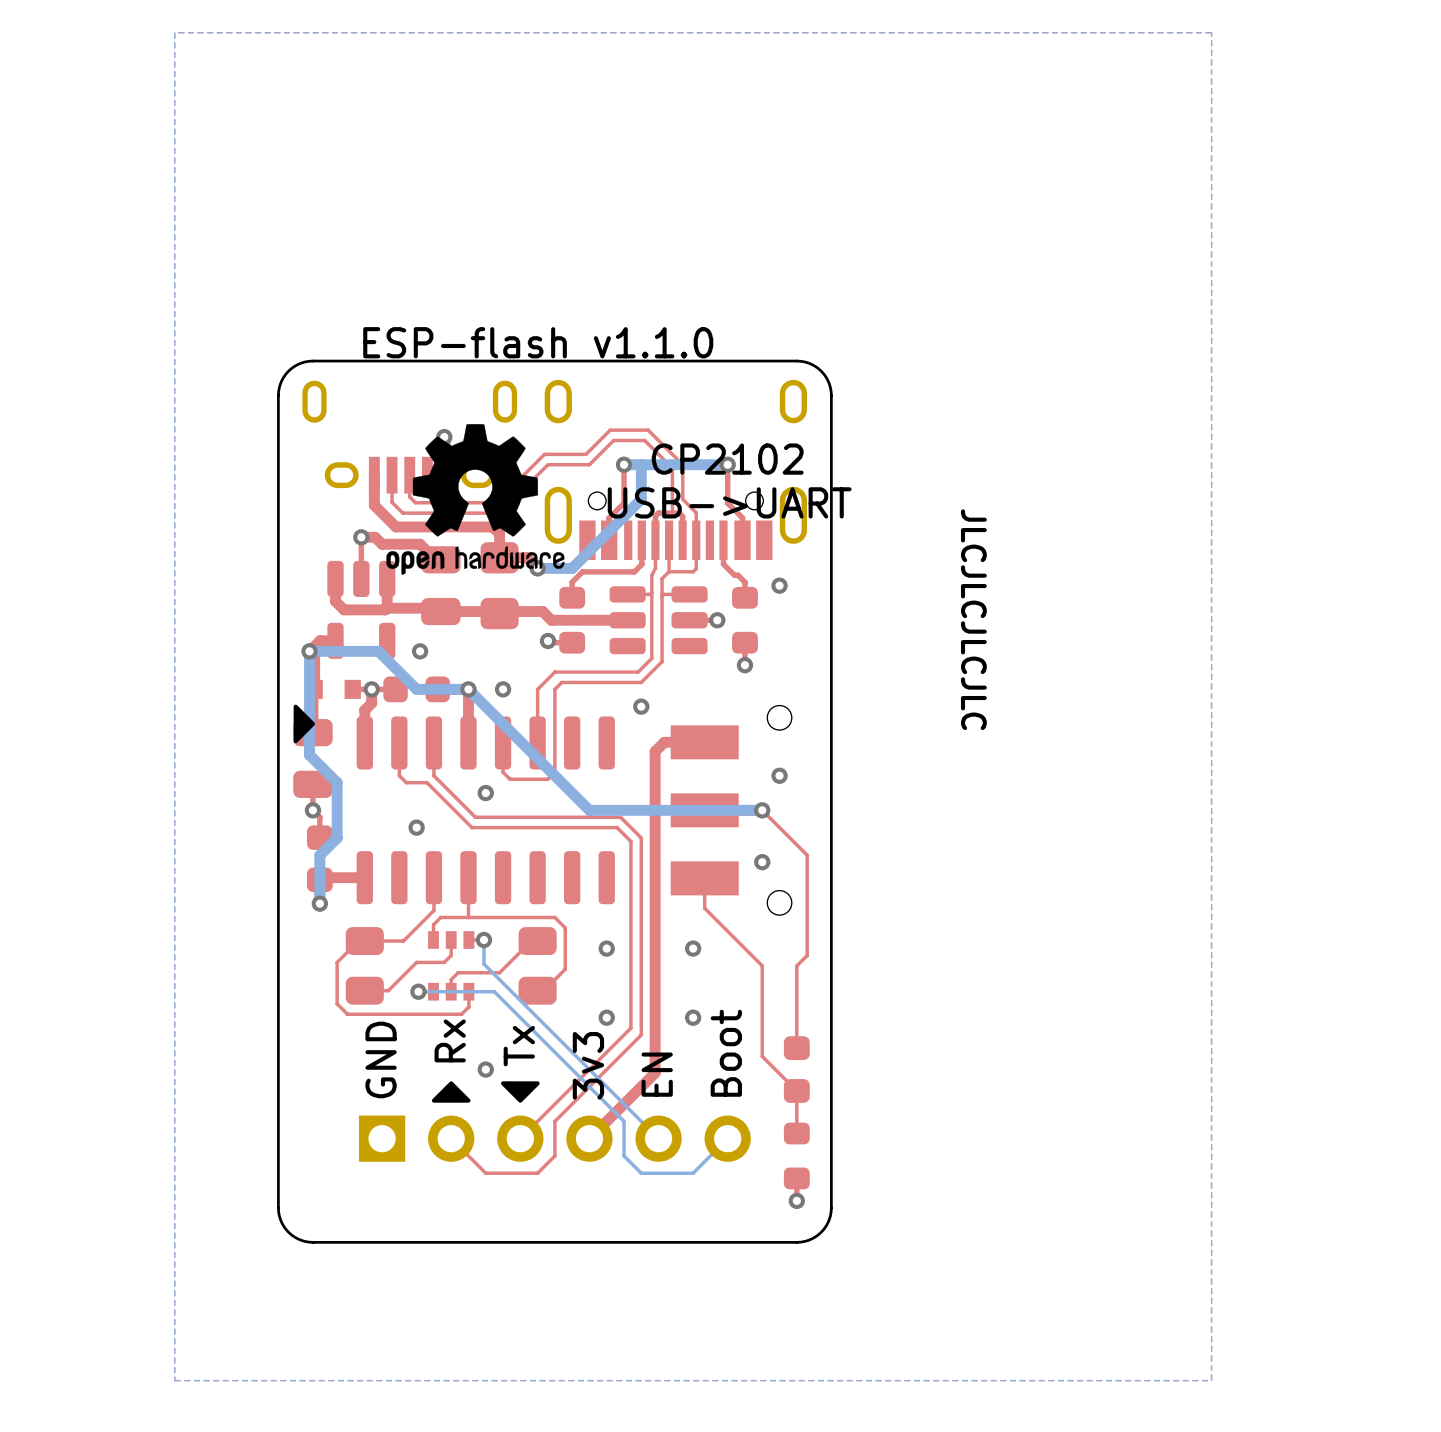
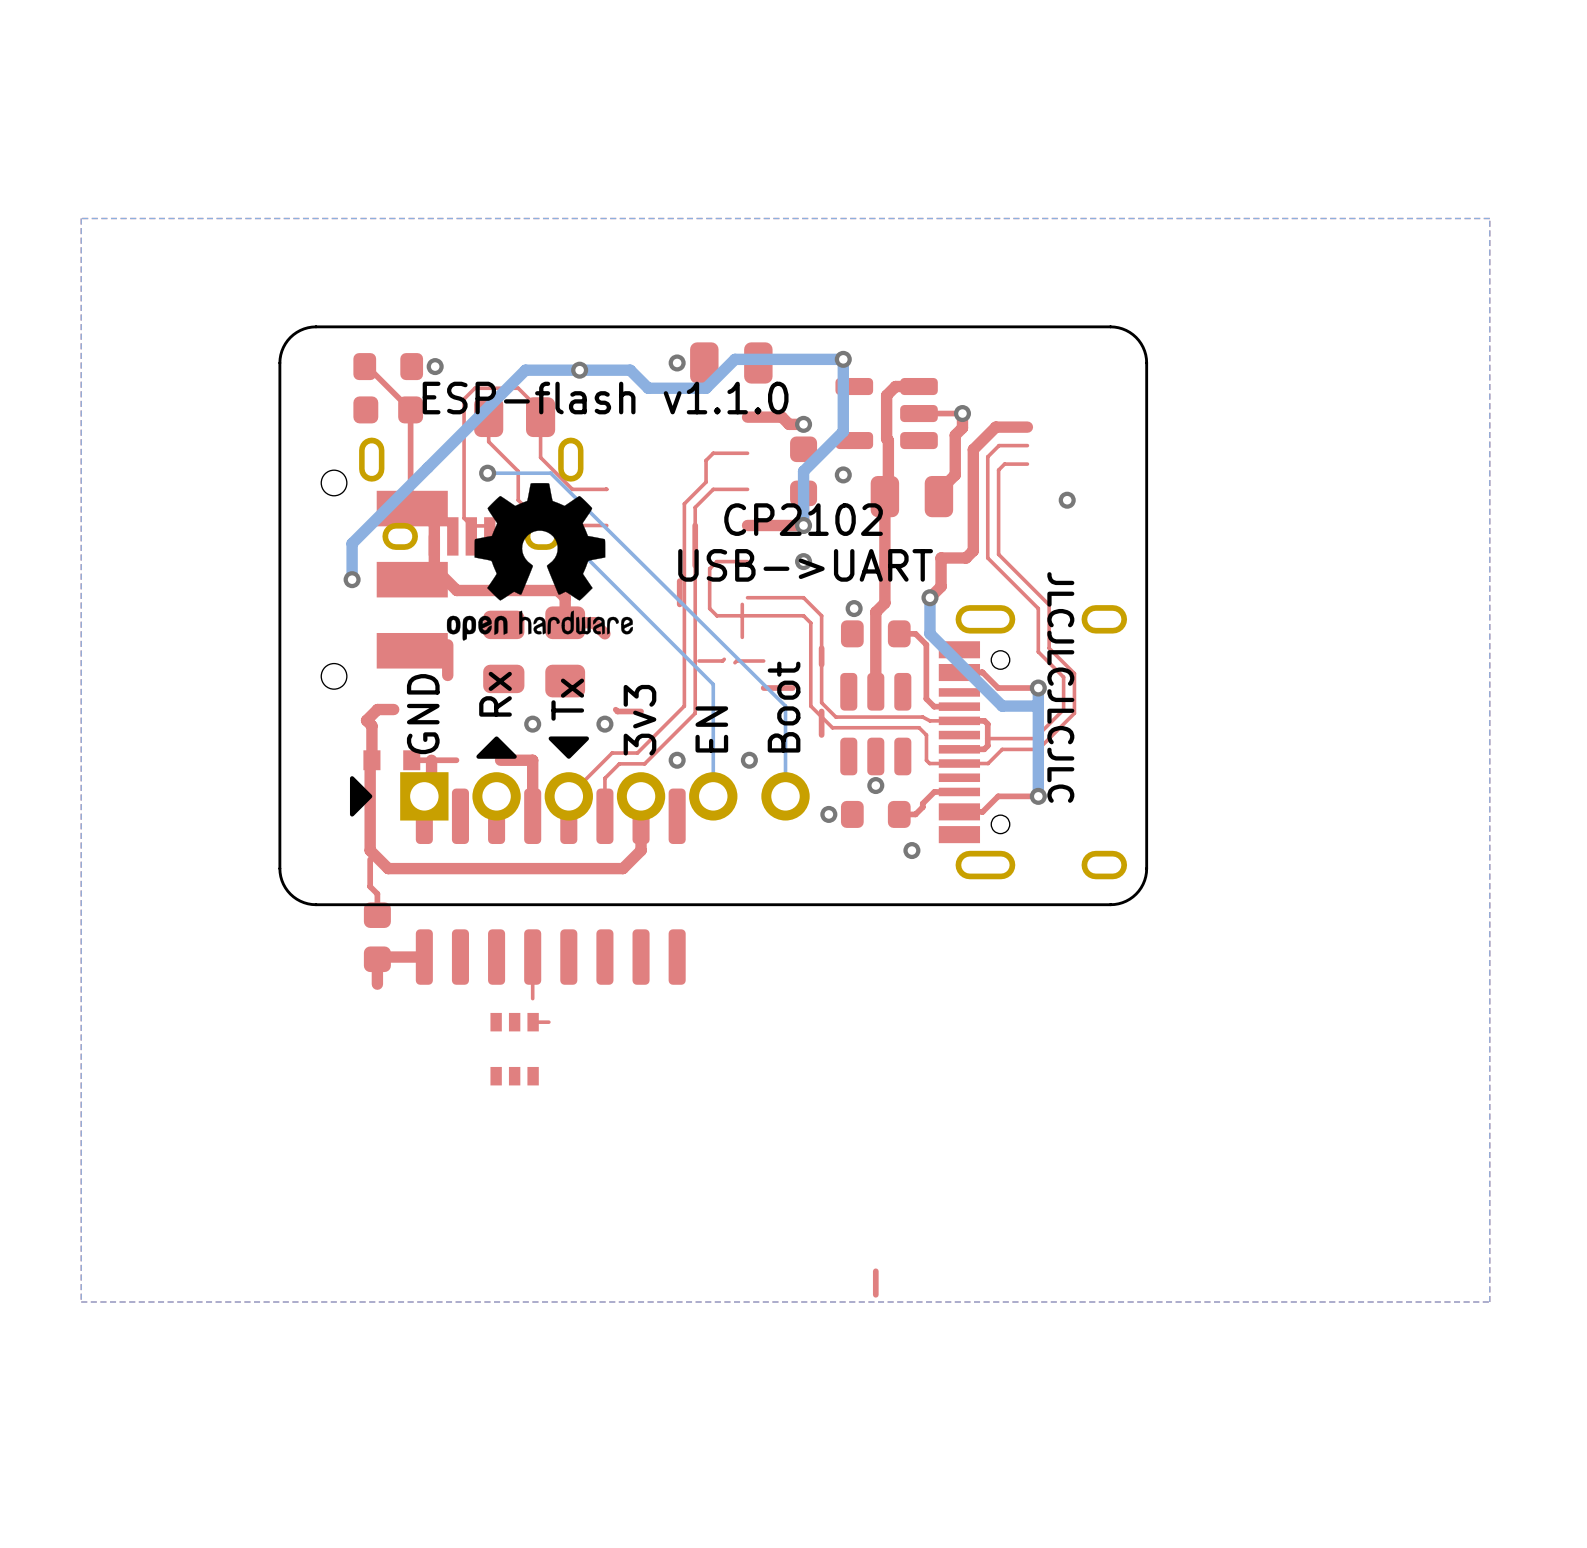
bottom zone outline: (1211, 32) (1211, 1380) (174, 1380) (174, 32) (1211, 32) -> (1489, 218) (1489, 1302) (81, 1302) (81, 218) (1489, 218)
board edge: none -> (1110, 326) (315, 326) (296, 332) (283, 347) (279, 362) (279, 868) (285, 887) (296, 899) (315, 904) (1110, 904) (1129, 899) (1143, 884) (1146, 868) (1146, 362) (1144, 351) (1136, 337) (1126, 330) (1110, 326)
via: none -> (843, 359)
via: none -> (677, 362)
part: none -> (731, 362)
top track: none -> (364, 366) (367, 366) (410, 409) (410, 506) (412, 508)
part: none -> (388, 366)
via: none -> (435, 366)
via: none -> (579, 370)
top track: none -> (918, 386) (895, 386) (886, 395) (888, 493) (884, 496) (884, 603) (875, 612) (875, 691)
part: none -> (388, 409)
top track: none -> (918, 413) (962, 413) (962, 427) (955, 435) (955, 474) (938, 491) (938, 496)
via: none -> (962, 413)
top track: none -> (488, 417) (488, 441) (518, 471) (518, 500) (525, 507) (541, 507)
part: none -> (514, 417)
top track: none -> (747, 417) (781, 417) (789, 424) (803, 424)
board edge: (796, 361) (312, 361) (294, 366) (283, 377) (278, 395) (278, 1207) (281, 1222) (294, 1237) (312, 1242) (796, 1242) (815, 1237) (826, 1226) (831, 1207) (831, 395) (829, 384) (821, 371) (808, 362) (796, 361) -> none
via: none -> (803, 424)
top track: none -> (1027, 427) (995, 427) (973, 449) (973, 550) (966, 558) (941, 558) (941, 586) (929, 597)
top track: none -> (1027, 445) (999, 445) (987, 456) (987, 558) (1038, 608) (1038, 651) (1063, 677) (1063, 709) (1034, 738) (987, 738)
top track: none -> (1027, 464) (1004, 464) (998, 470) (998, 554) (1049, 604) (1049, 648) (1074, 673) (1074, 713) (1038, 749) (1002, 749) (988, 763) (929, 763) (926, 760) (926, 735) (919, 727) (832, 727) (810, 706) (810, 623) (803, 615) (716, 615) (709, 608) (709, 568) (716, 561) (747, 561)
bottom track: none -> (487, 473) (550, 473) (785, 706) (785, 796)
via: none -> (843, 474)
top track: none -> (606, 488) (572, 489) (540, 457) (540, 410) (518, 388) (474, 388) (464, 399) (464, 518) (471, 525) (487, 525)
top track: (641, 430) (610, 430) (586, 454) (544, 454) (496, 502) (415, 502) (409, 497) (409, 475) -> (713, 489) (695, 507) (695, 525)
top track: (648, 430) (682, 464) (682, 499) (696, 512) (696, 568) (693, 571) (669, 571) (662, 578) (662, 661) (641, 682) (568, 682) -> (747, 453) (713, 453) (706, 460) (706, 482) (684, 503) (684, 706) (637, 753)
top track: none -> (747, 489) (720, 489)
top track: none -> (803, 493) (803, 525) (747, 525)
via position: (444, 437) -> (487, 473)
part: none -> (911, 496)
via: none -> (1067, 500)
top track: none -> (606, 525) (565, 525)
via: (624, 464) -> none
bottom track: (641, 464) (641, 499) (572, 568) (537, 568) -> none
top track: (727, 464) (727, 503) (742, 517) (742, 540) -> none
bottom track: (727, 464) (624, 464) -> (803, 525) (803, 471) (843, 431) (843, 359) (734, 359) (706, 388) (648, 388) (630, 370) (525, 370) (352, 543) (352, 579)
part rotation: 0° (675, 469) -> 90° clockwise (1032, 742)
part position: (675, 469) -> (1032, 742)
top track: (392, 475) (392, 502) (402, 513) (499, 513) (547, 464) (589, 464) (613, 440) (644, 440) (672, 468) (672, 513) -> none
bottom track: none -> (541, 541) (570, 541) (713, 684) (713, 796)
via: none -> (803, 561)
top track: (624, 503) (608, 518) -> (695, 565) (695, 713) (644, 763) (619, 763) (604, 778)
via: none -> (352, 579)
bottom track: none -> (929, 597) (929, 633) (1002, 706) (1038, 706)
via: none -> (929, 597)
via: (361, 537) -> none
top track: (641, 540) (641, 564) (634, 571) (582, 571) (572, 582) (572, 597) -> none
top track: (682, 540) (682, 516) (679, 513) (658, 513) (655, 516) (655, 568) (651, 575) (651, 658) (638, 672) -> none
top track: (723, 540) (723, 564) (744, 582) -> (747, 597) (803, 597) (821, 615) (821, 648)
top track: (440, 559) (435, 559) (420, 544) (382, 544) (375, 537) (361, 537) (361, 578) -> none
via: (537, 568) -> none
part: none -> (875, 633)
top track: none -> (899, 633) (915, 633) (926, 644) (926, 698) (934, 706) (959, 706)
top track: (335, 578) (335, 601) (344, 609) (437, 608) (440, 611) (542, 611) (551, 620) (627, 620) -> none
via position: (779, 585) -> (854, 608)
top track: none -> (821, 664) (821, 702)
top track: none -> (982, 671) (998, 688) (1038, 688)
part rotation: 0° (361, 609) -> 90° clockwise (886, 413)
part position: (361, 609) -> (886, 413)
part: (572, 620) -> none
part rotation: 0° (658, 620) -> 90° clockwise (875, 724)
part position: (658, 620) -> (875, 724)
via: (717, 620) -> none
part: (744, 620) -> none
bottom track: none -> (1038, 688) (1038, 796)
via: none -> (1038, 688)
top track: none -> (821, 702) (835, 717) (922, 717) (929, 720) (984, 720) (987, 724) (987, 745) (984, 749) (959, 749)
via position: (547, 640) -> (604, 724)
via: (309, 651) -> none
via: (420, 651) -> none
via: none -> (532, 724)
via: (744, 665) -> none
top track: (637, 672) (554, 672) (544, 682) -> none
top track: (561, 682) (554, 689) (554, 772) (547, 779) (509, 779) (503, 772) (503, 742) -> (630, 753) (612, 753)
via: (371, 689) -> none
part rotation: 0° (416, 689) -> 90° clockwise (803, 471)
part position: (416, 689) -> (803, 471)
via: (468, 689) -> none
via: (503, 689) -> none
top track: (537, 689) (537, 706) -> (604, 760) (568, 796)
via: none -> (677, 760)
via: none -> (749, 760)
via: (641, 706) -> none
via: none -> (875, 785)
top track: none -> (959, 791) (934, 791) (915, 814) (899, 814)
top track: none -> (641, 796) (641, 850) (622, 868) (388, 868) (370, 850) (370, 805)
top track: none -> (1038, 796) (998, 796) (982, 811) (959, 811)
via: none -> (1038, 796)
via: none -> (828, 814)
part: none -> (875, 814)
top track: (399, 742) (399, 775) (406, 782) (427, 782) (471, 827) (617, 827) (630, 841) (630, 1028) (520, 1138) -> none
top track: (433, 742) (433, 775) (475, 817) (620, 817) (641, 837) (641, 1034) (554, 1121) (554, 1155) (537, 1173) (485, 1173) (451, 1138) -> none
top track: (704, 742) (664, 742) (655, 751) (655, 1073) (589, 1138) -> none
part: (312, 758) -> none
via: (779, 775) -> none
via: none -> (911, 850)
via: (485, 793) -> none
via: (312, 810) -> none
top track: (704, 810) (762, 810) (807, 855) (807, 955) (796, 965) (796, 1048) -> none
part rotation: 0° (731, 810) -> 180° (384, 579)
part position: (731, 810) -> (384, 579)
bottom track: (762, 810) (589, 810) (468, 689) (416, 689) (378, 651) (309, 651) (309, 755) (337, 782) (337, 837) (319, 855) (319, 903) -> none
via: (762, 810) -> none
via: (416, 827) -> none
via: (762, 862) -> none
top track: (433, 878) (433, 910) (403, 941) (358, 941) (337, 962) (337, 1003) (347, 1014) (461, 1014) (468, 1006) (468, 991) -> none
top track: (704, 878) (704, 908) (762, 965) (762, 1056) (796, 1090) (796, 1135) -> none
via: (319, 903) -> none
top track: (433, 940) (433, 924) (440, 917) (554, 917) (565, 927) (565, 969) (543, 990) (537, 990) -> none
top track: (451, 940) (451, 955) (444, 962) (416, 962) (388, 990) (364, 990) -> none
bottom track: (483, 940) (483, 964) (658, 1138) -> none
via: (483, 940) -> none
top track: (537, 941) (531, 941) (499, 972) (458, 972) (451, 979) (451, 991) -> none
via: (606, 948) -> none
via: (693, 948) -> none
part: (364, 965) -> none
part: (537, 965) -> none
bottom track: (418, 991) (494, 991) (624, 1121) (624, 1155) (641, 1173) (693, 1173) (727, 1138) -> none
via: (418, 991) -> none
via: (606, 1017) -> none
via: (693, 1017) -> none
text position: Rx (450, 1040) -> Rx (495, 694)
text position: Tx (519, 1046) -> Tx (567, 699)
text position: Boot (726, 1053) -> Boot (784, 707)
text position: GND (381, 1059) -> GND (423, 714)
text position: 3v3 (588, 1065) -> 3v3 (639, 720)
via: (485, 1069) -> none
part: (796, 1069) -> none
text position: EN (657, 1074) -> EN (711, 729)
drawing position: (451, 1092) -> (496, 747)
drawing position: (520, 1092) -> (568, 747)
part position: (554, 1138) -> (604, 796)
part: (796, 1155) -> none
via: (796, 1200) -> none

